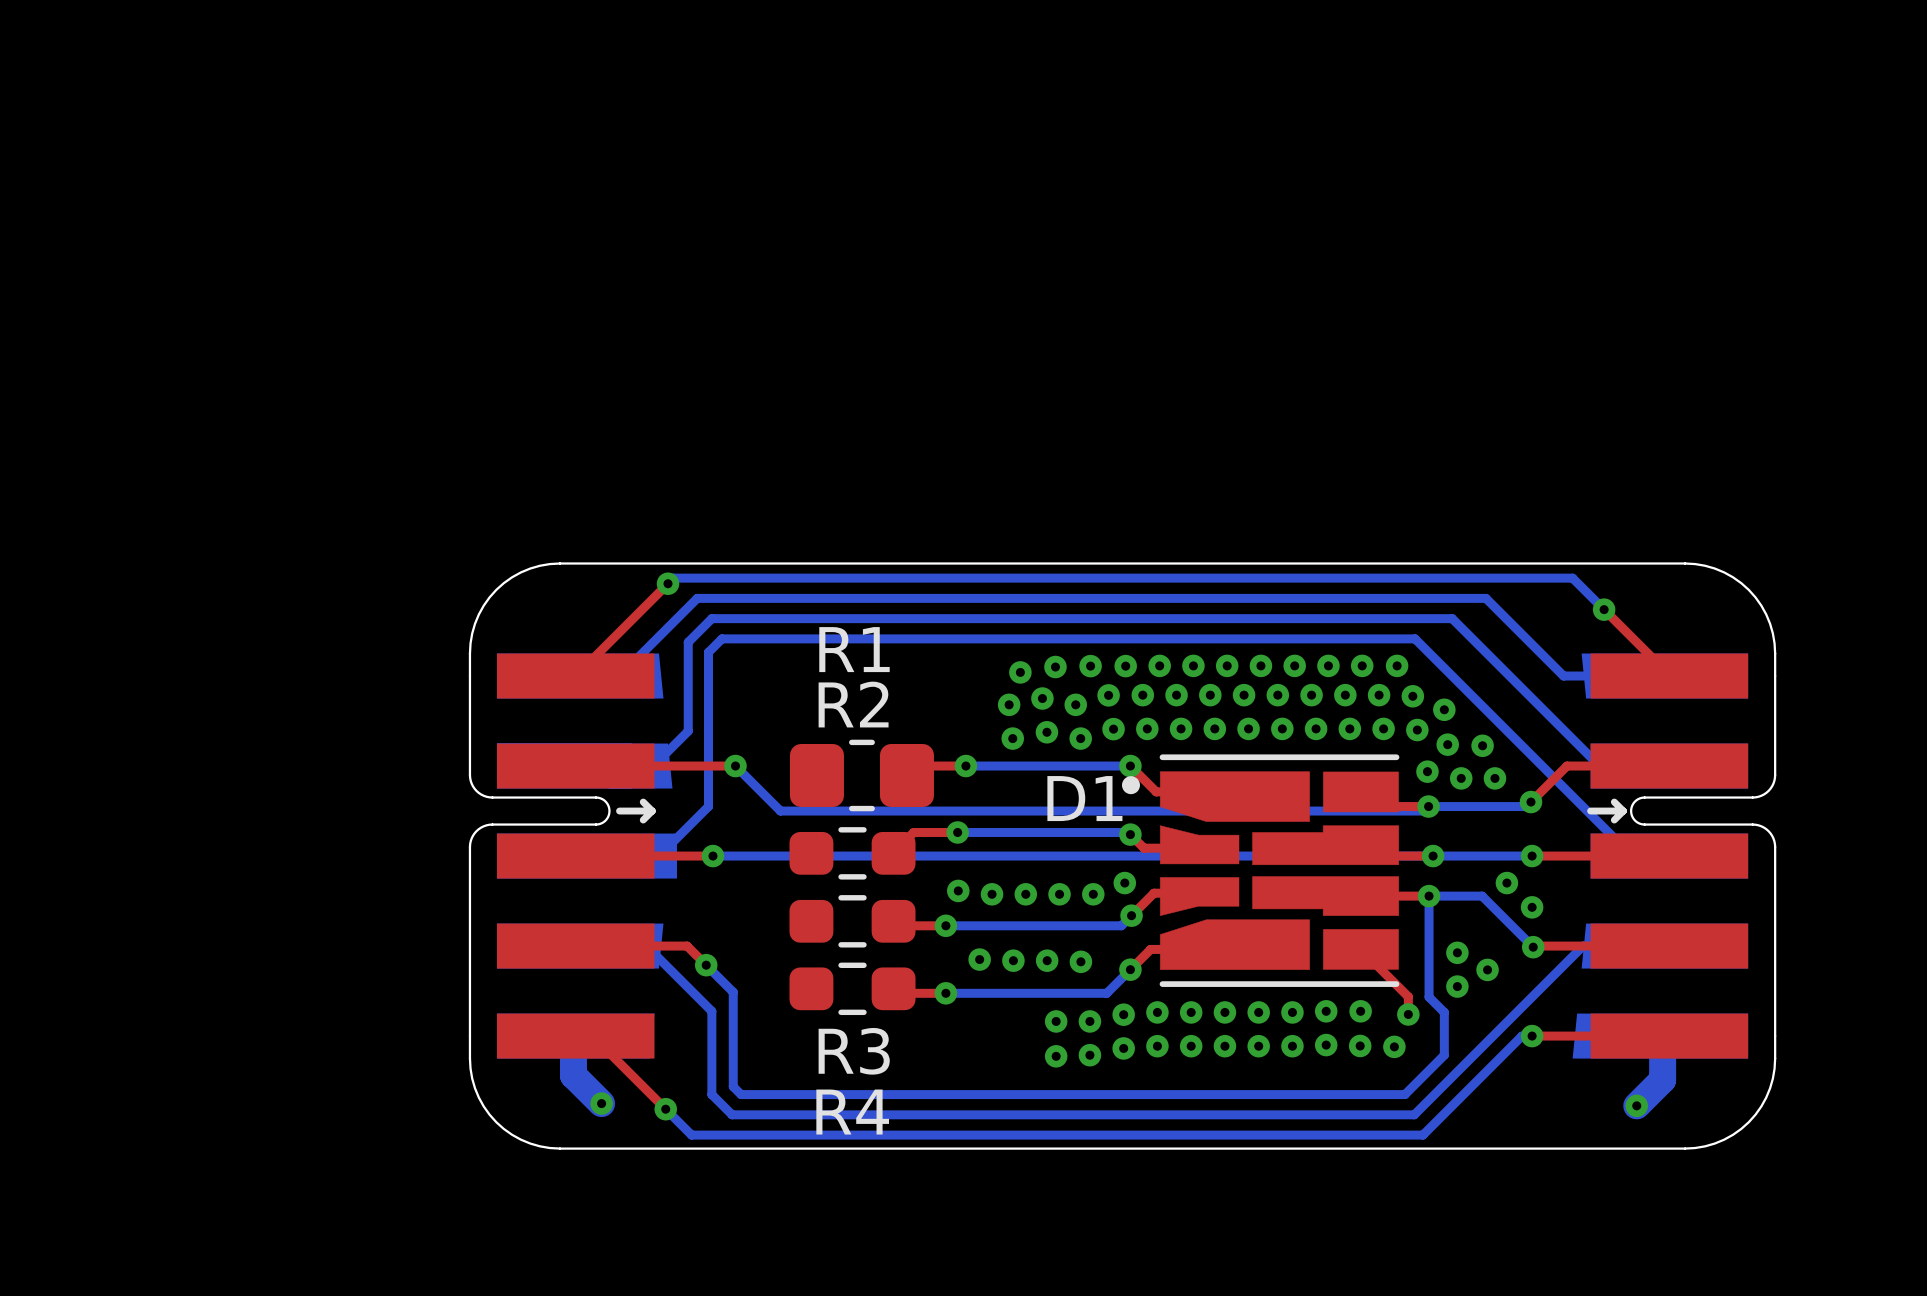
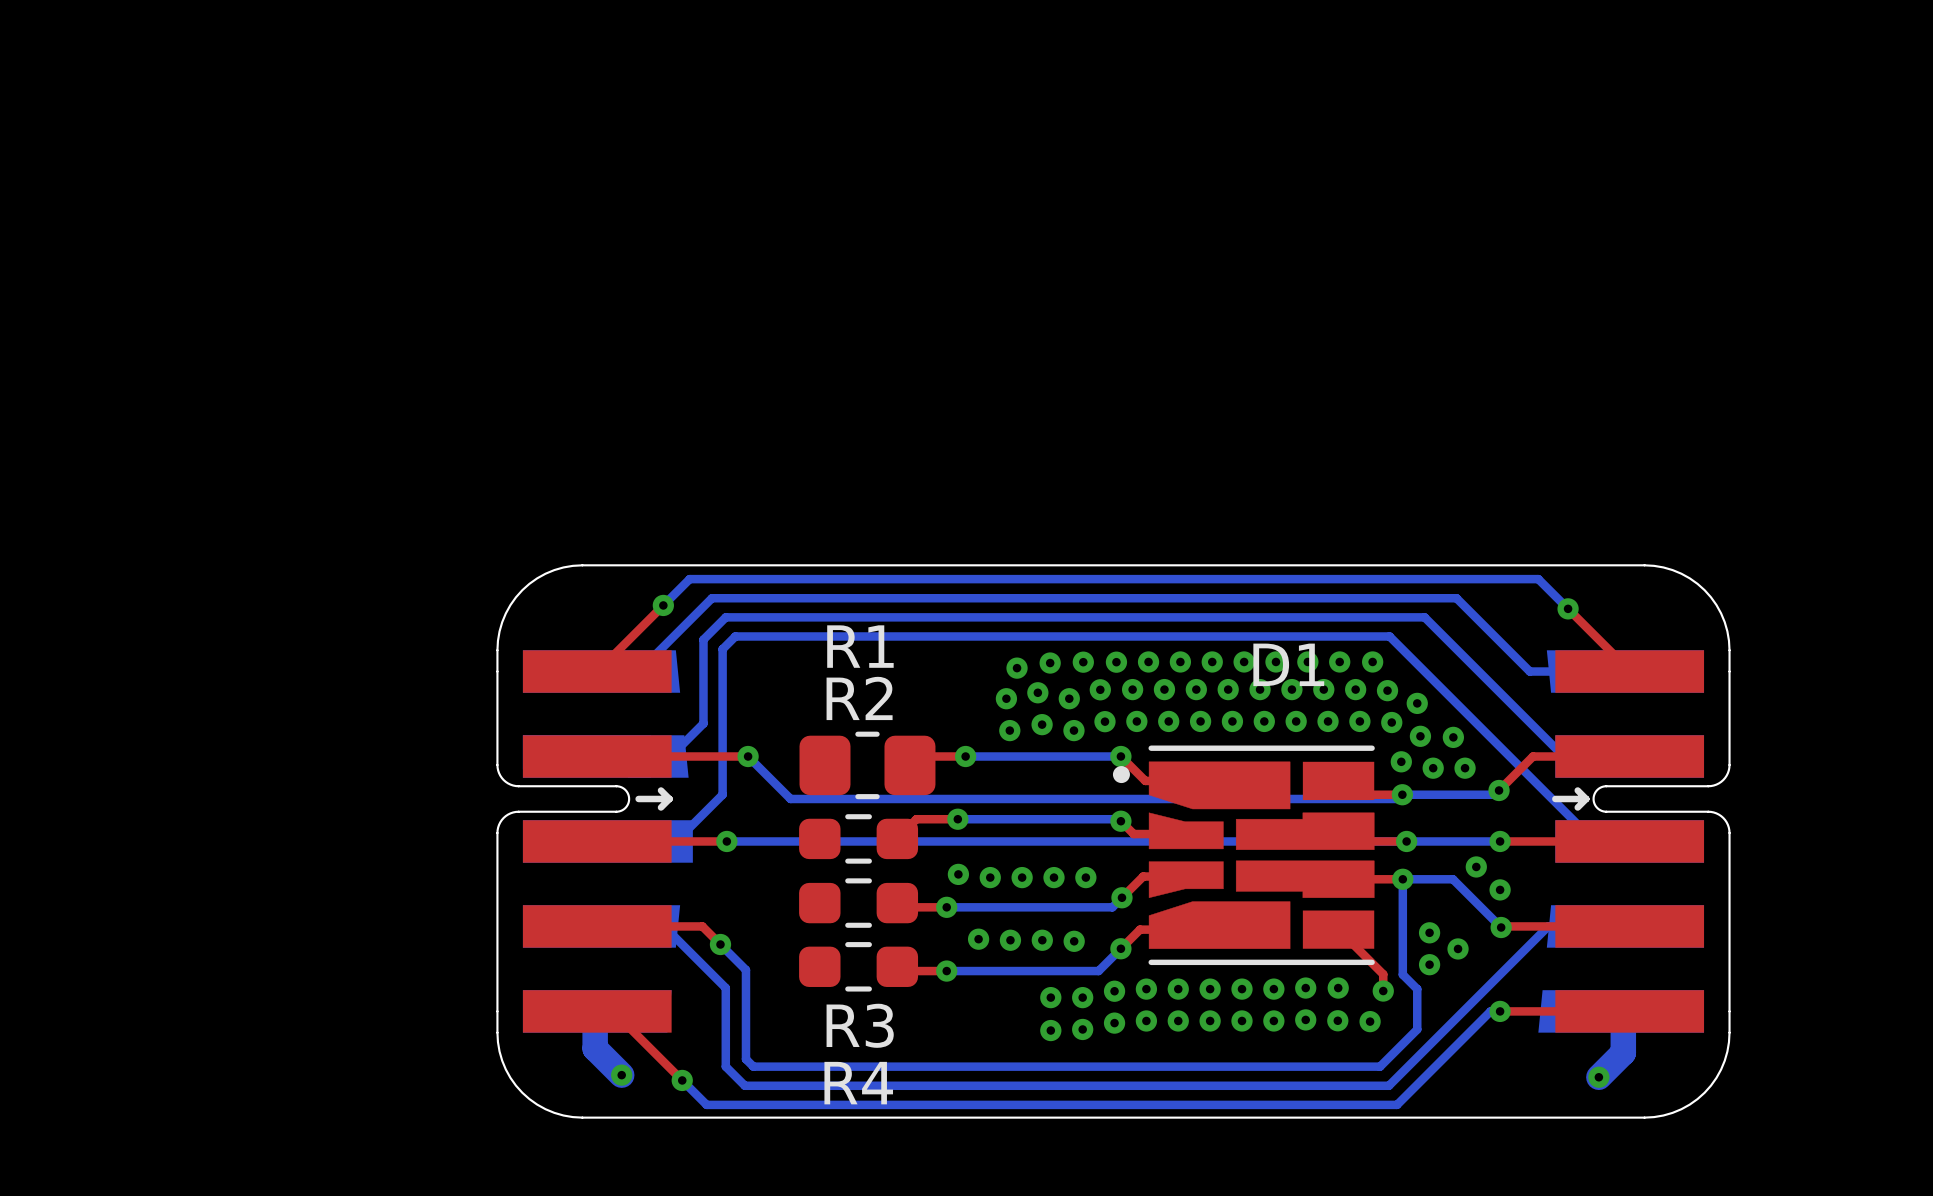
top track: (668, 583) (645, 606) -> none
bottom track: none -> (684, 584) (663, 605)
via position: (668, 583) -> (663, 605)
D1 name position: D1 (1084, 798) -> D1 (1288, 664)
via: (1124, 883) -> none

